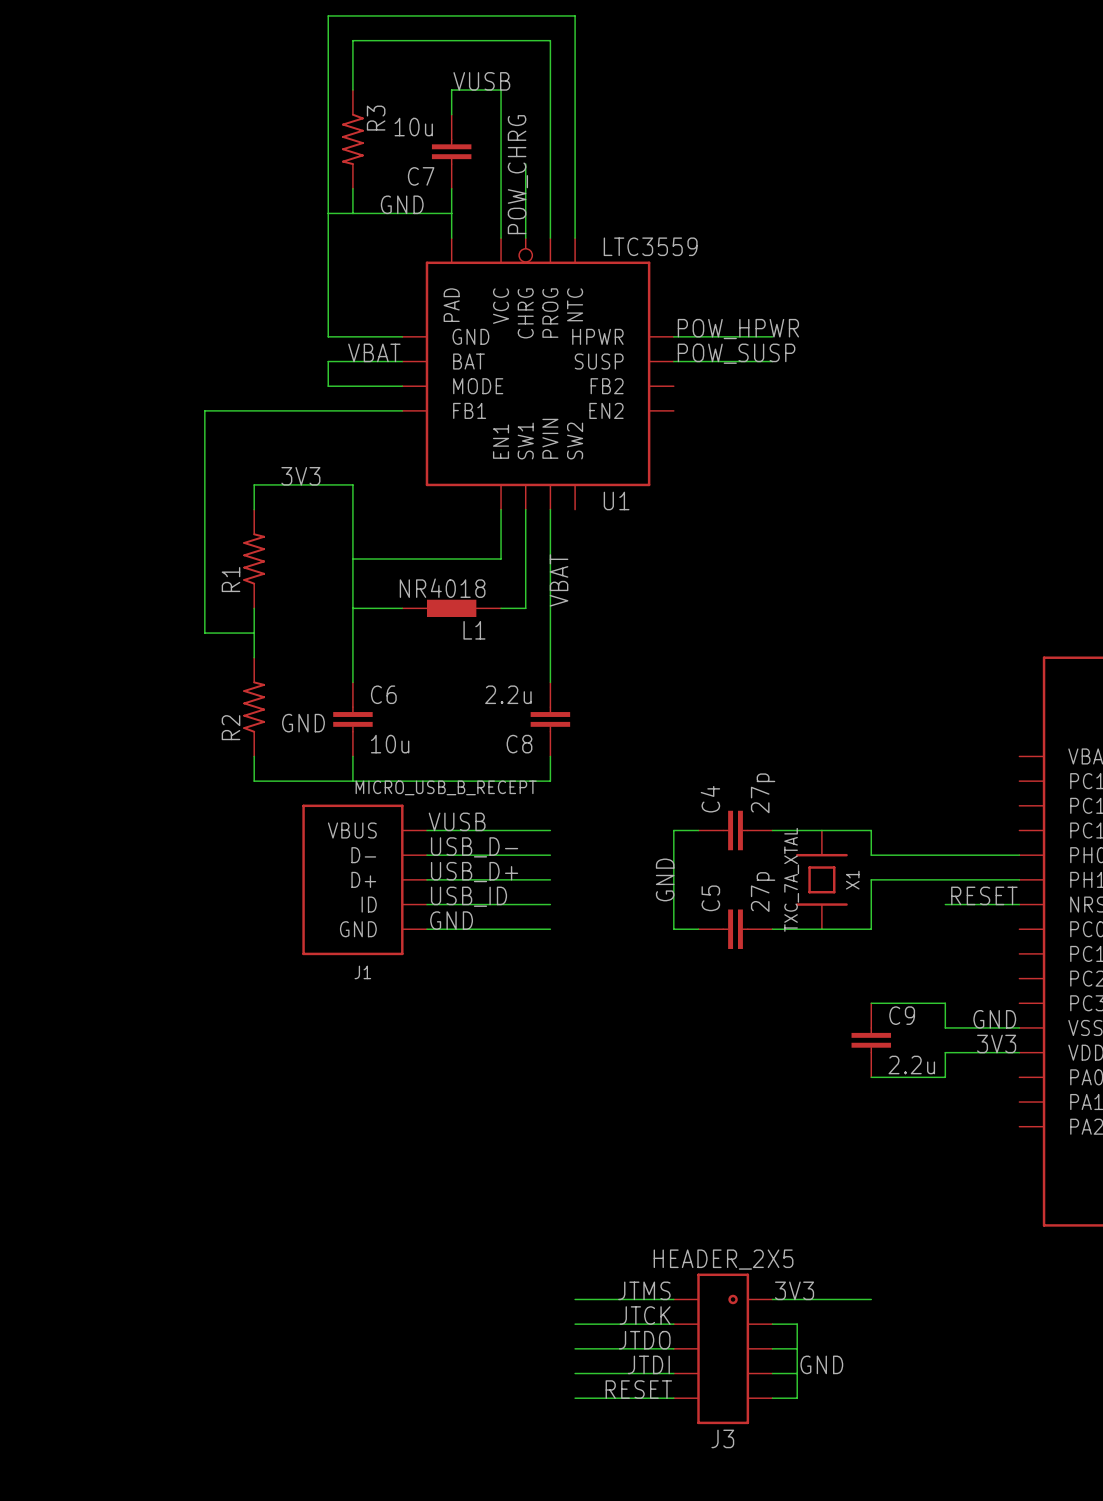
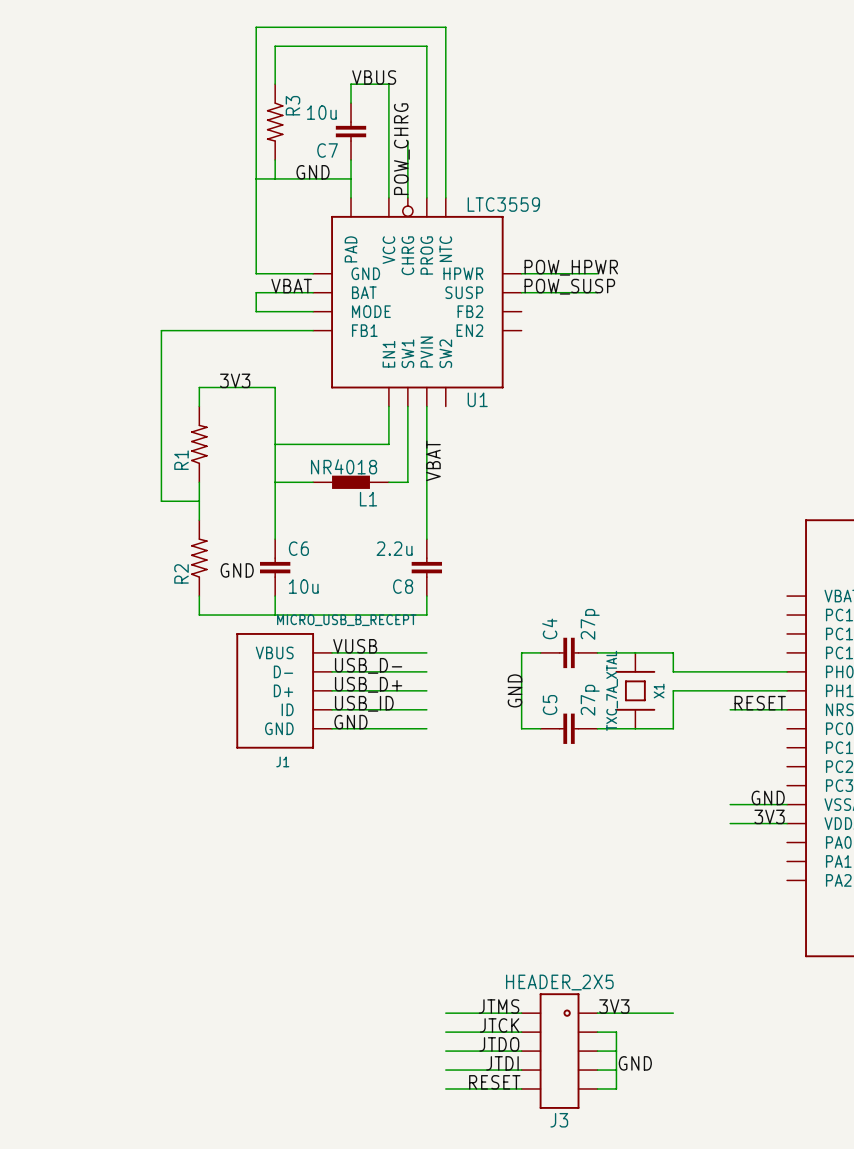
label: VUSB (481, 81) -> VBUS (374, 77)
wire: (871, 1003) (945, 1003) (945, 1027) -> none
C9: 2.2u (871, 1040) -> none
wire: (945, 1052) (945, 1077) (871, 1077) -> none

